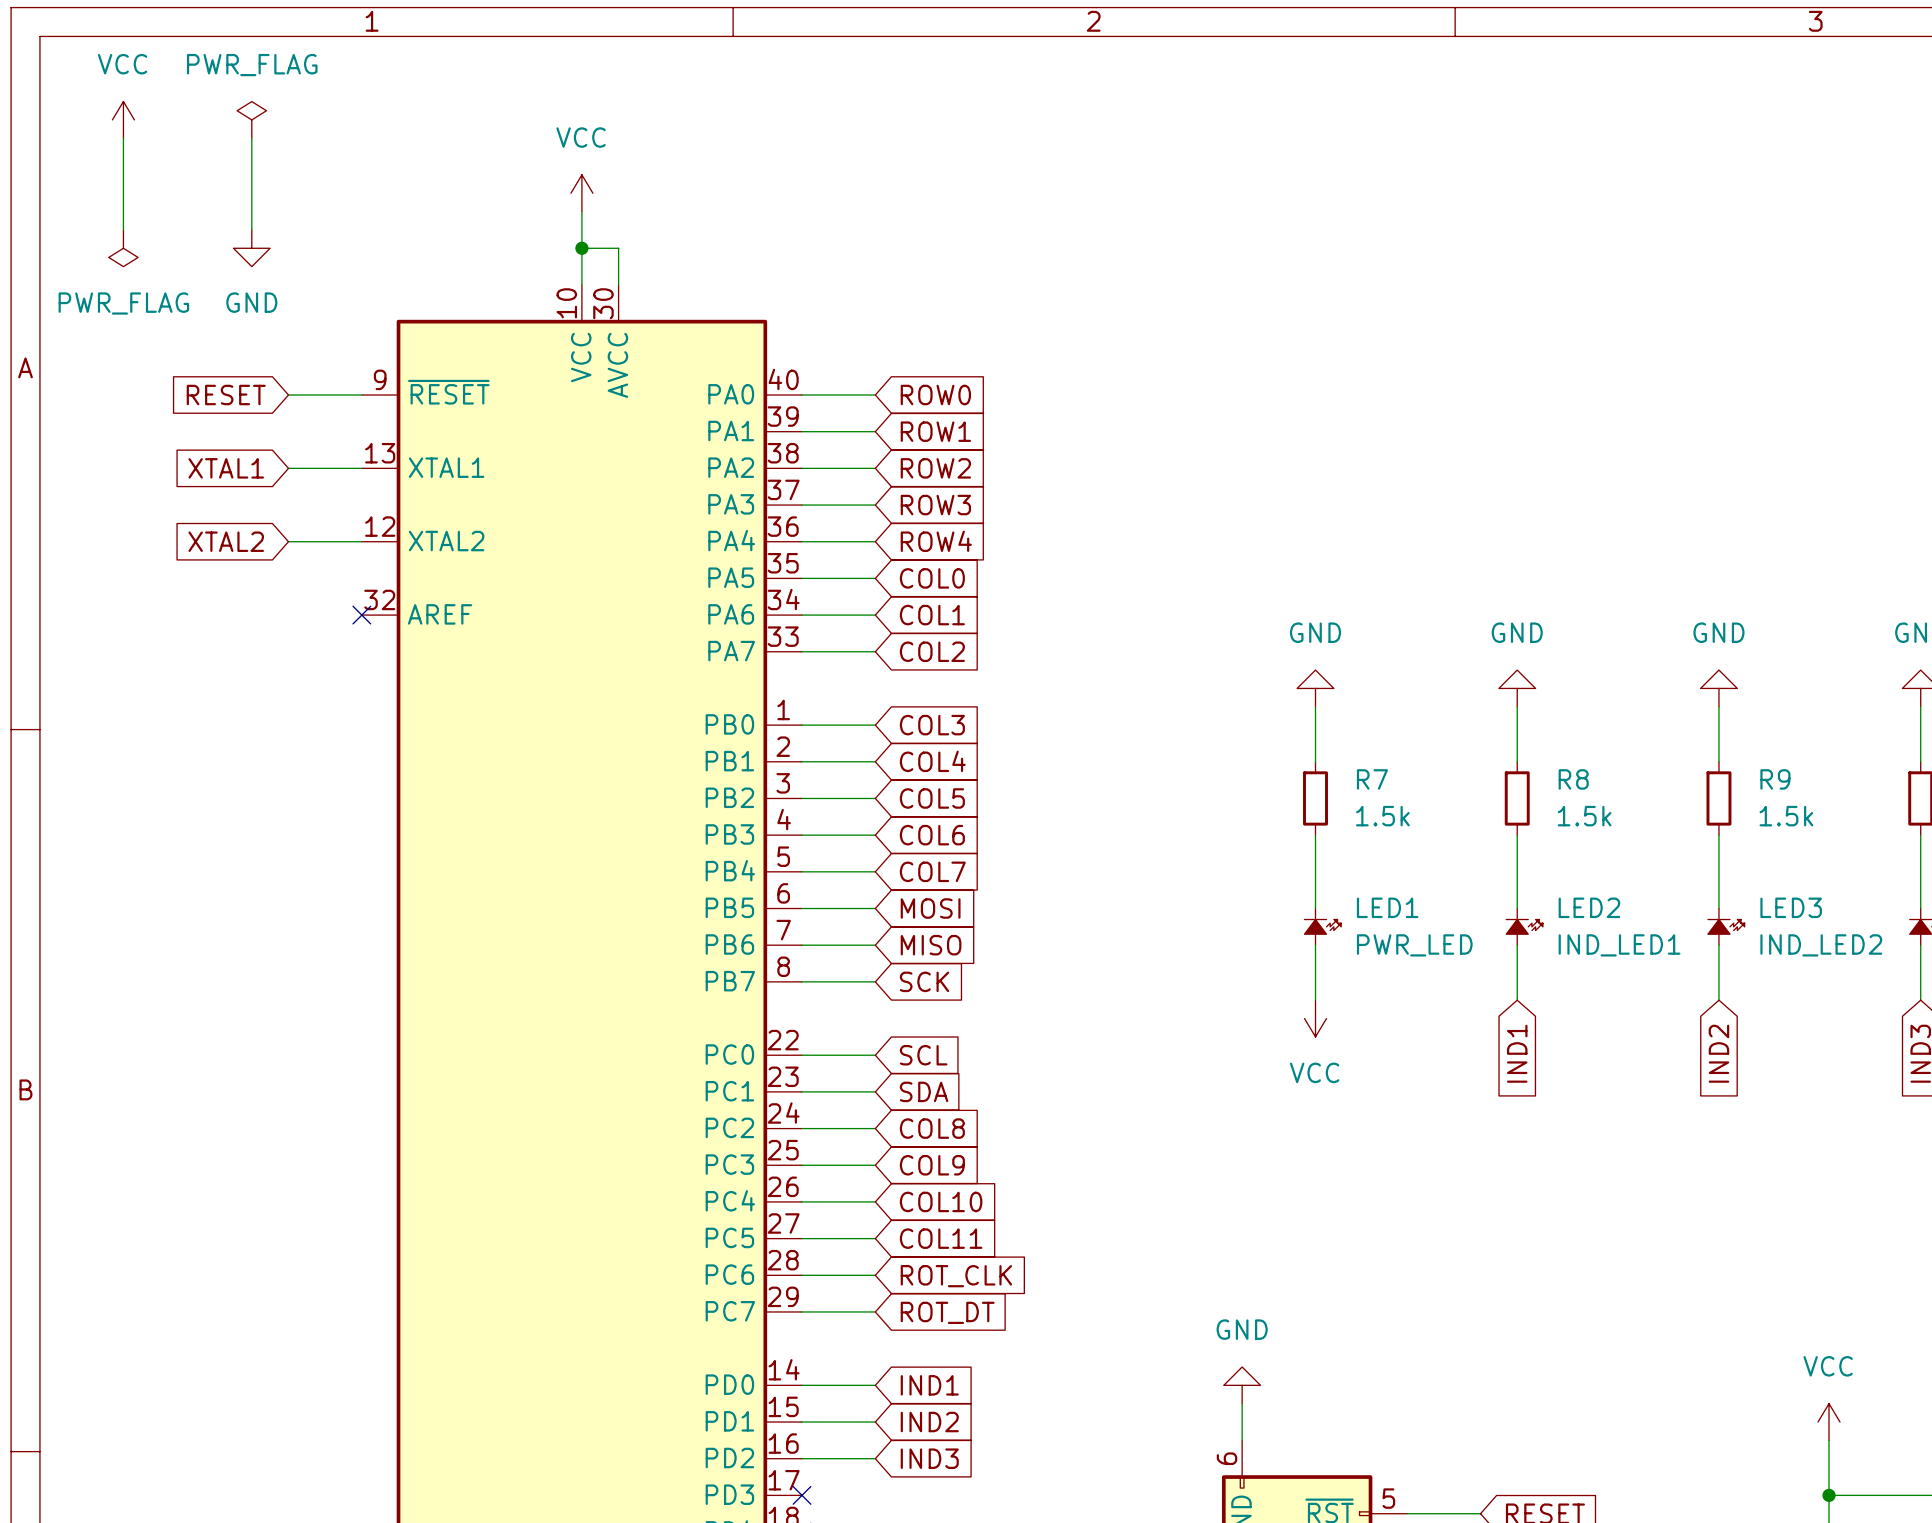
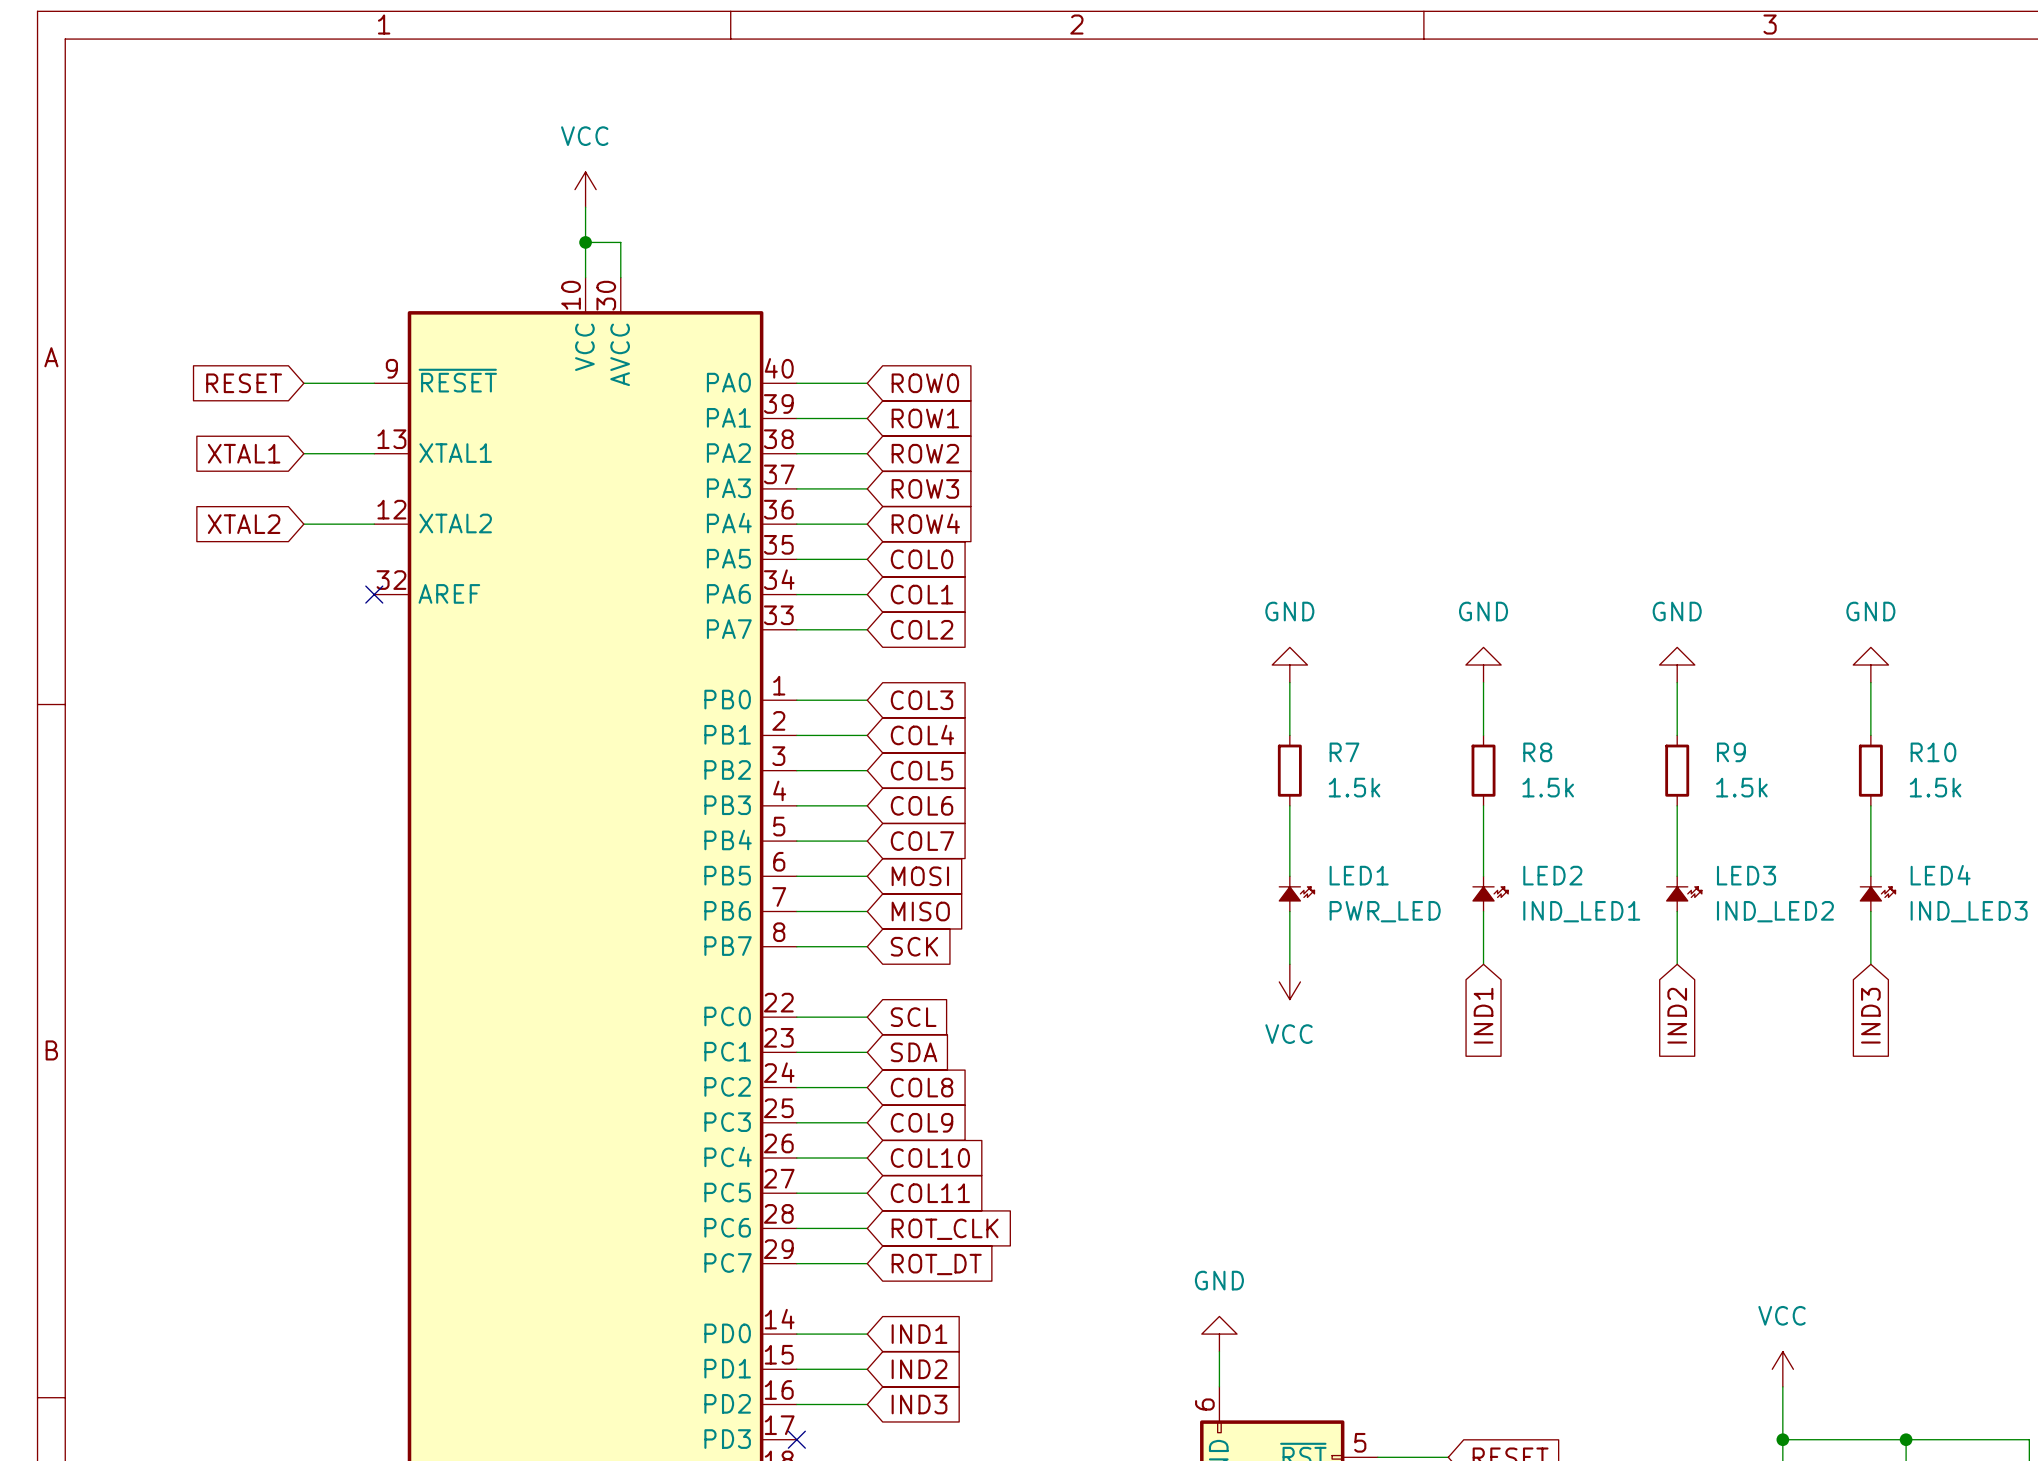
power symbol: VCC (123, 119) -> none
power symbol: PWR_FLAG (251, 119) -> none
wire: (123, 138) (123, 229) -> none
wire: (251, 138) (251, 229) -> none
power symbol: PWR_FLAG (123, 248) -> none
power symbol: GND (251, 248) -> none

